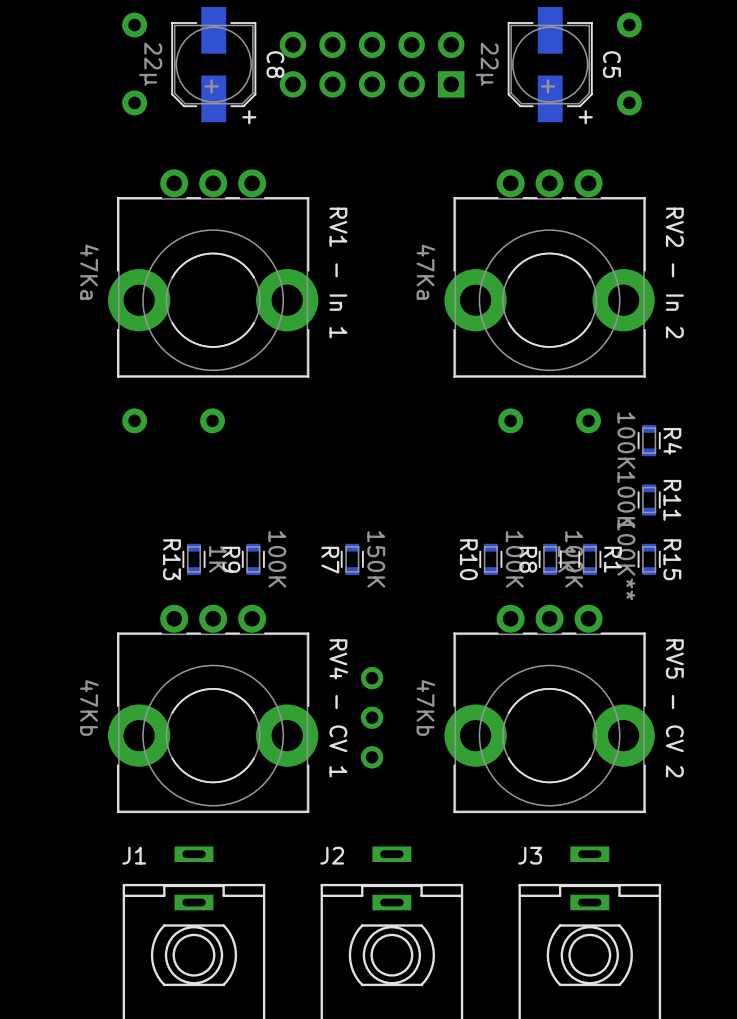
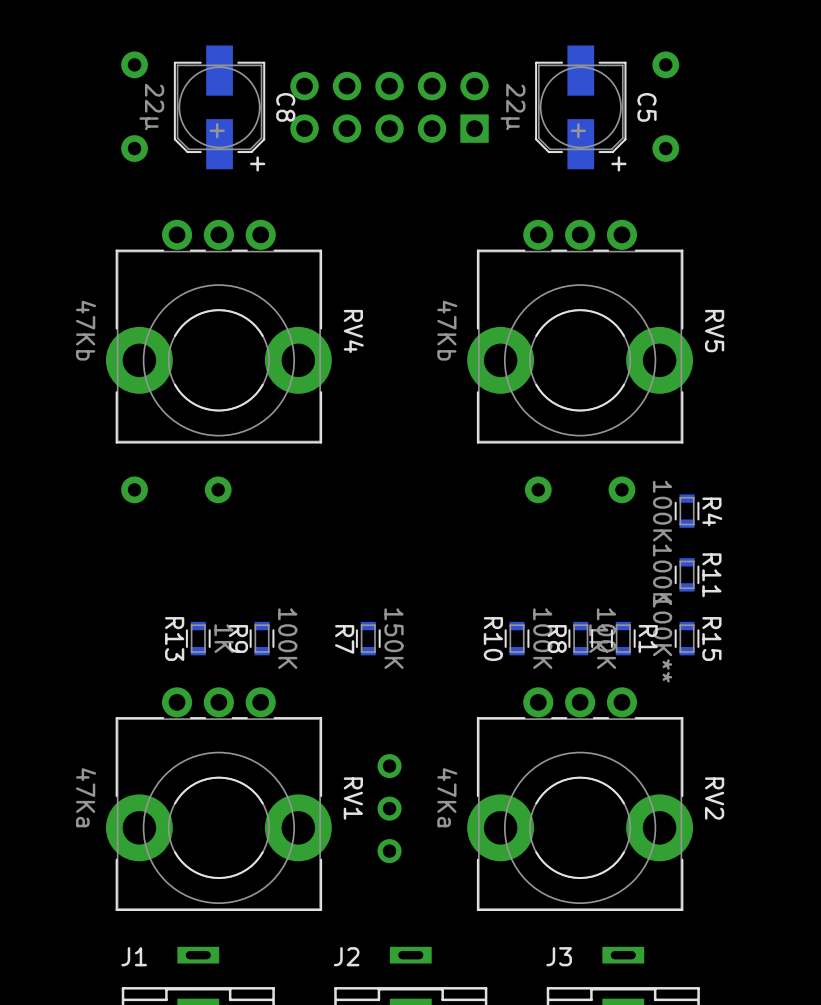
RV1 - In 1 value: 47Ka (89, 272) -> 47Kb (86, 330)
RV1 - In 1 name: RV1 - In 1 (338, 272) -> RV4 (353, 331)
RV2 - In 2 value: 47Ka (425, 272) -> 47Kb (447, 330)
RV2 - In 2 name: RV2 - In 2 (674, 272) -> RV5 (714, 331)
RV4 - CV 1 value: 47Kb (89, 707) -> 47Ka (86, 797)
RV5 - CV 2 value: 47Kb (425, 707) -> 47Ka (447, 797)
RV4 - CV 1 name: RV4 - CV 1 (338, 708) -> RV1 (353, 798)
RV5 - CV 2 name: RV5 - CV 2 (674, 708) -> RV2 (714, 798)

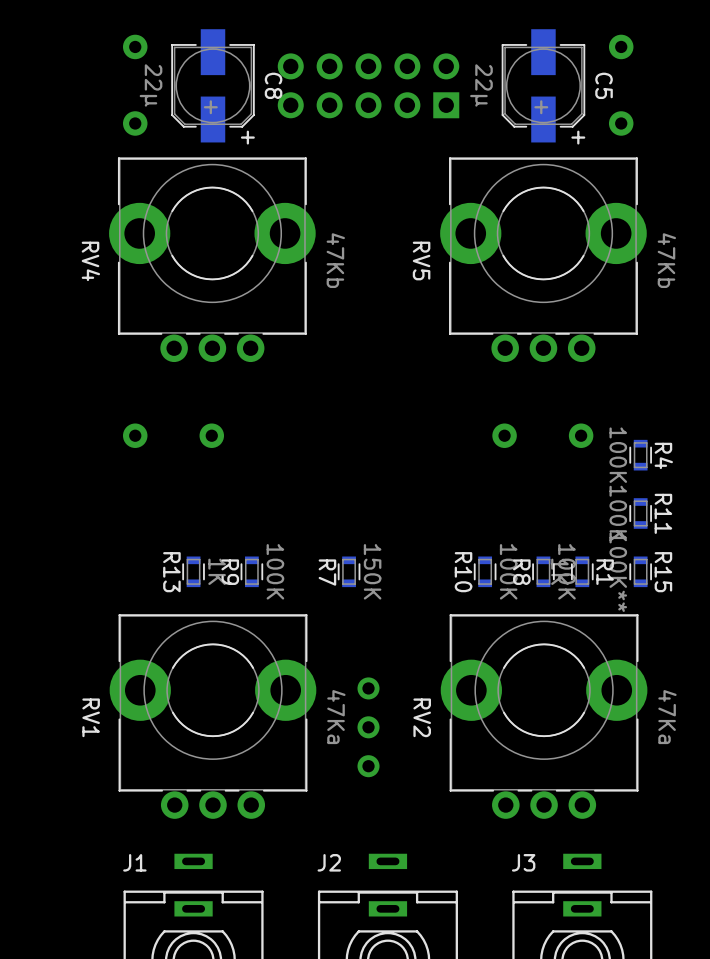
RV4 rotation: 0° (218, 331) -> 180° (212, 259)
RV5 rotation: 0° (580, 331) -> 180° (543, 259)
RV1 rotation: 0° (218, 799) -> 180° (212, 716)
RV2 rotation: 0° (580, 799) -> 180° (544, 716)

